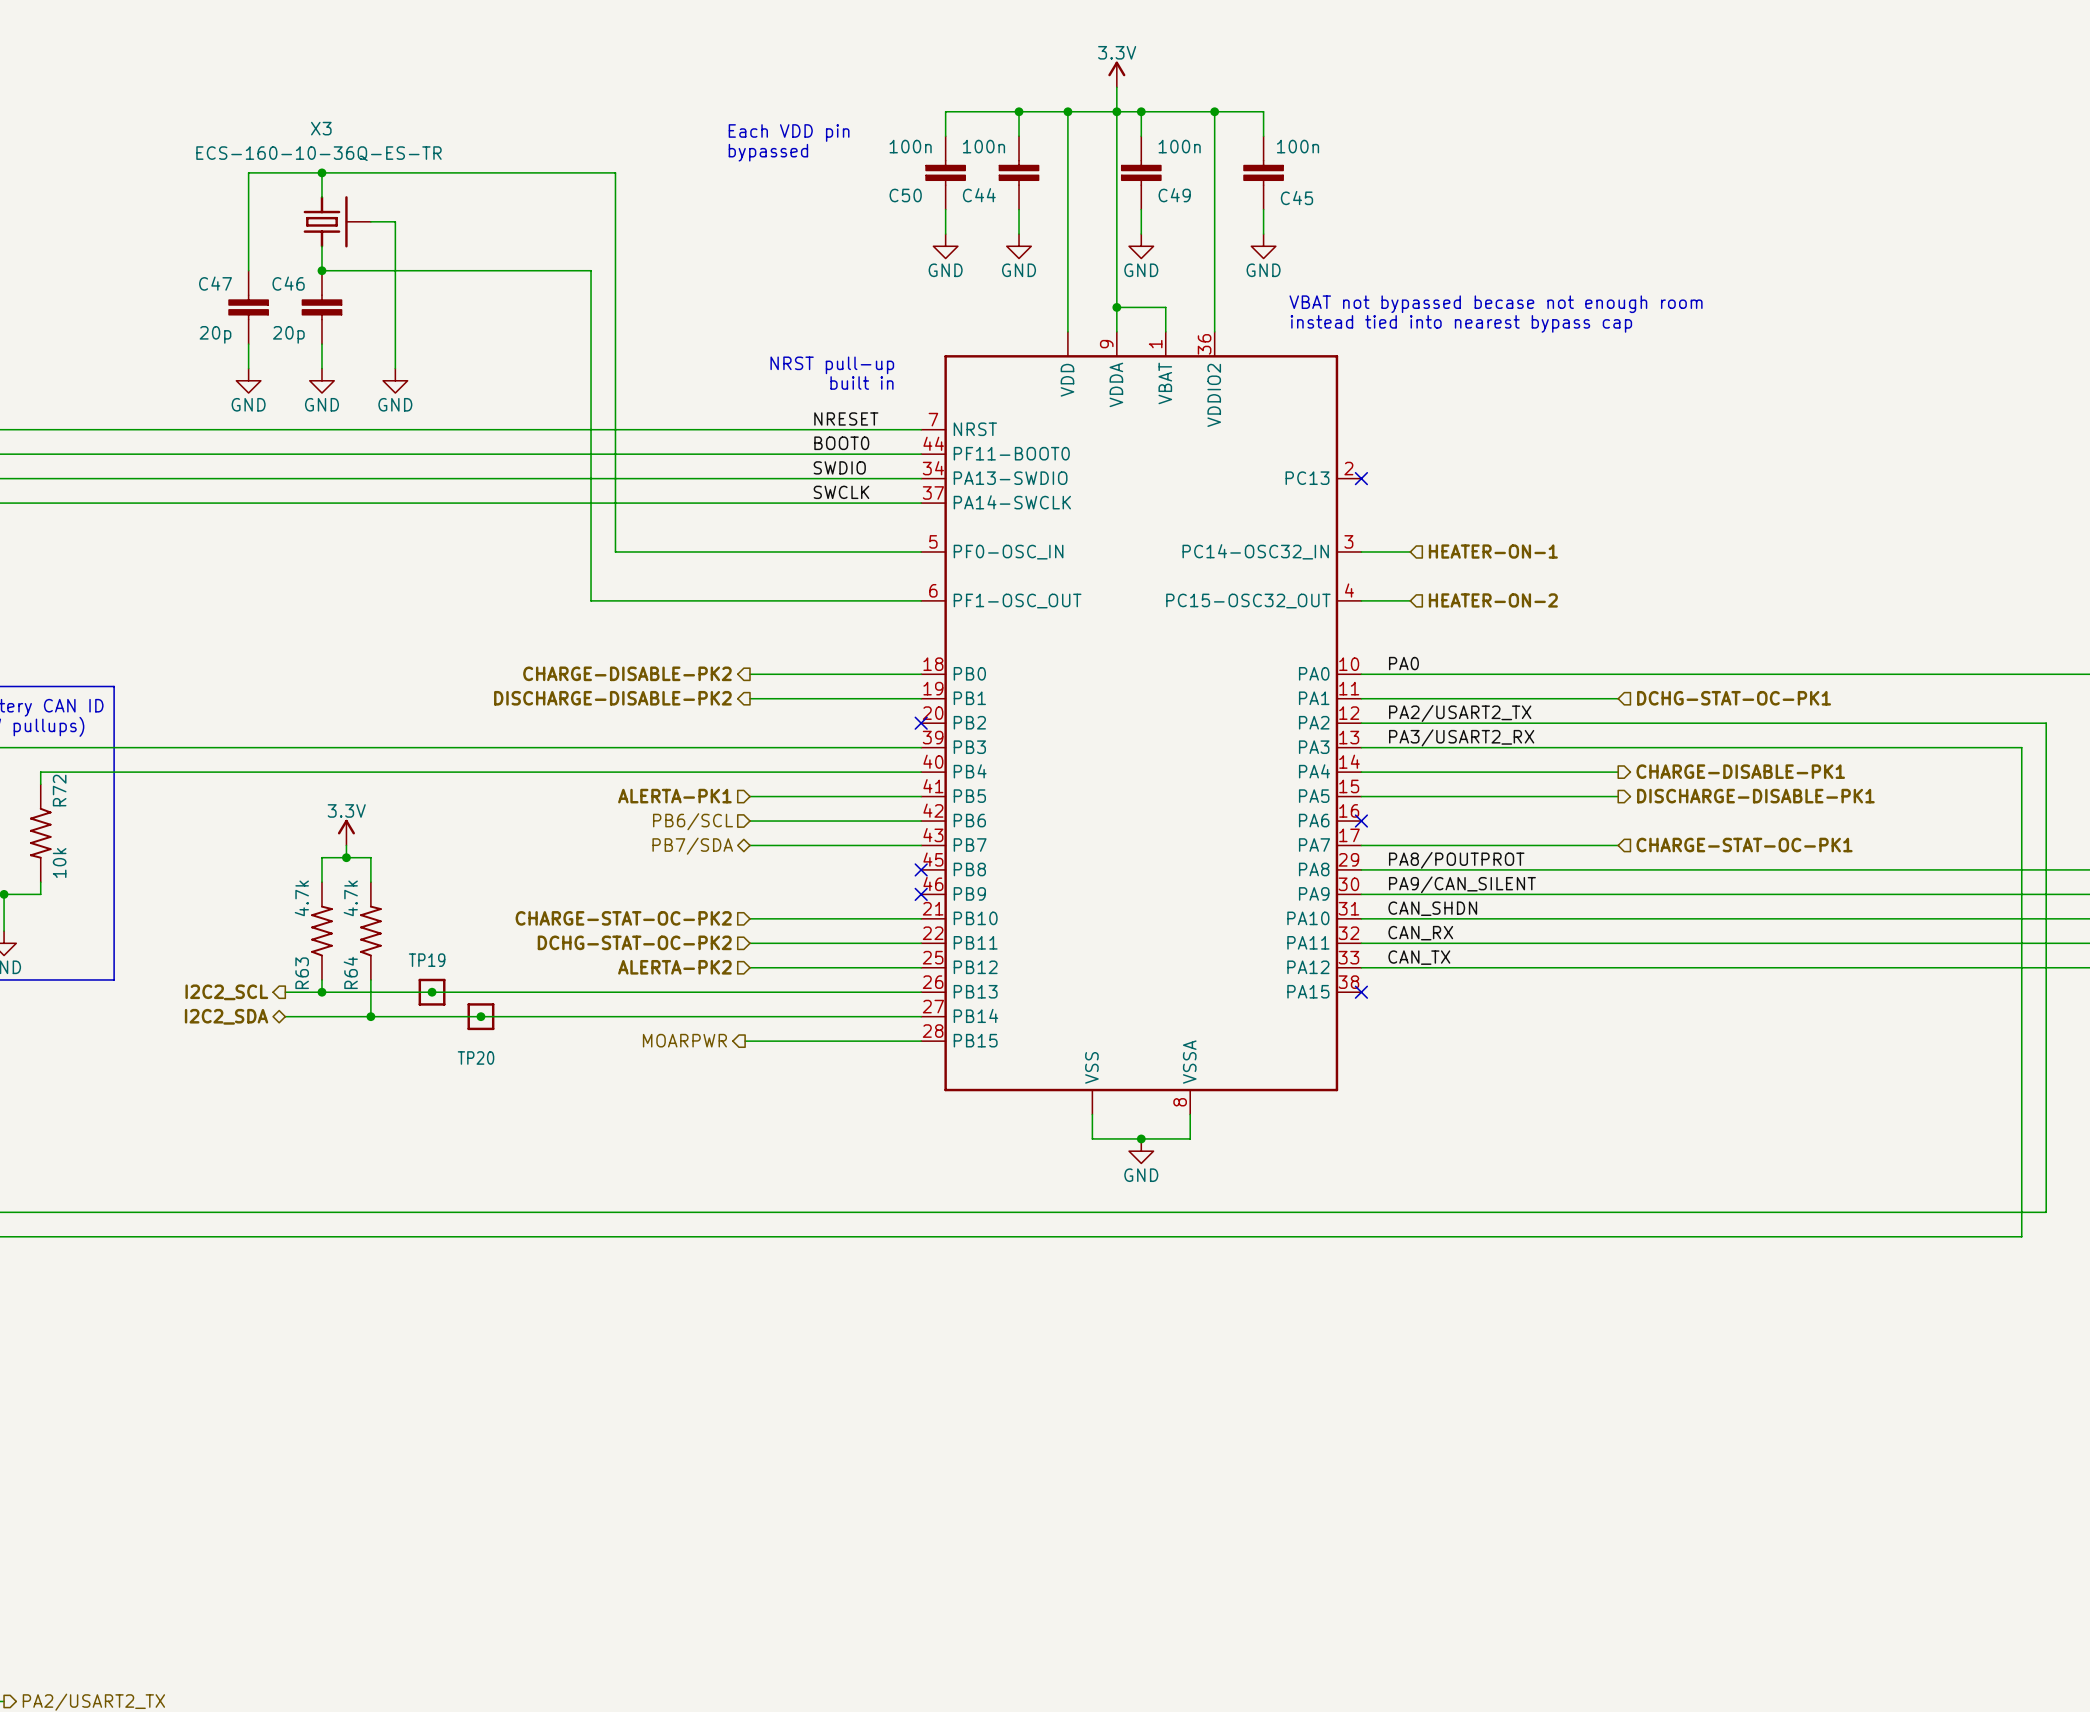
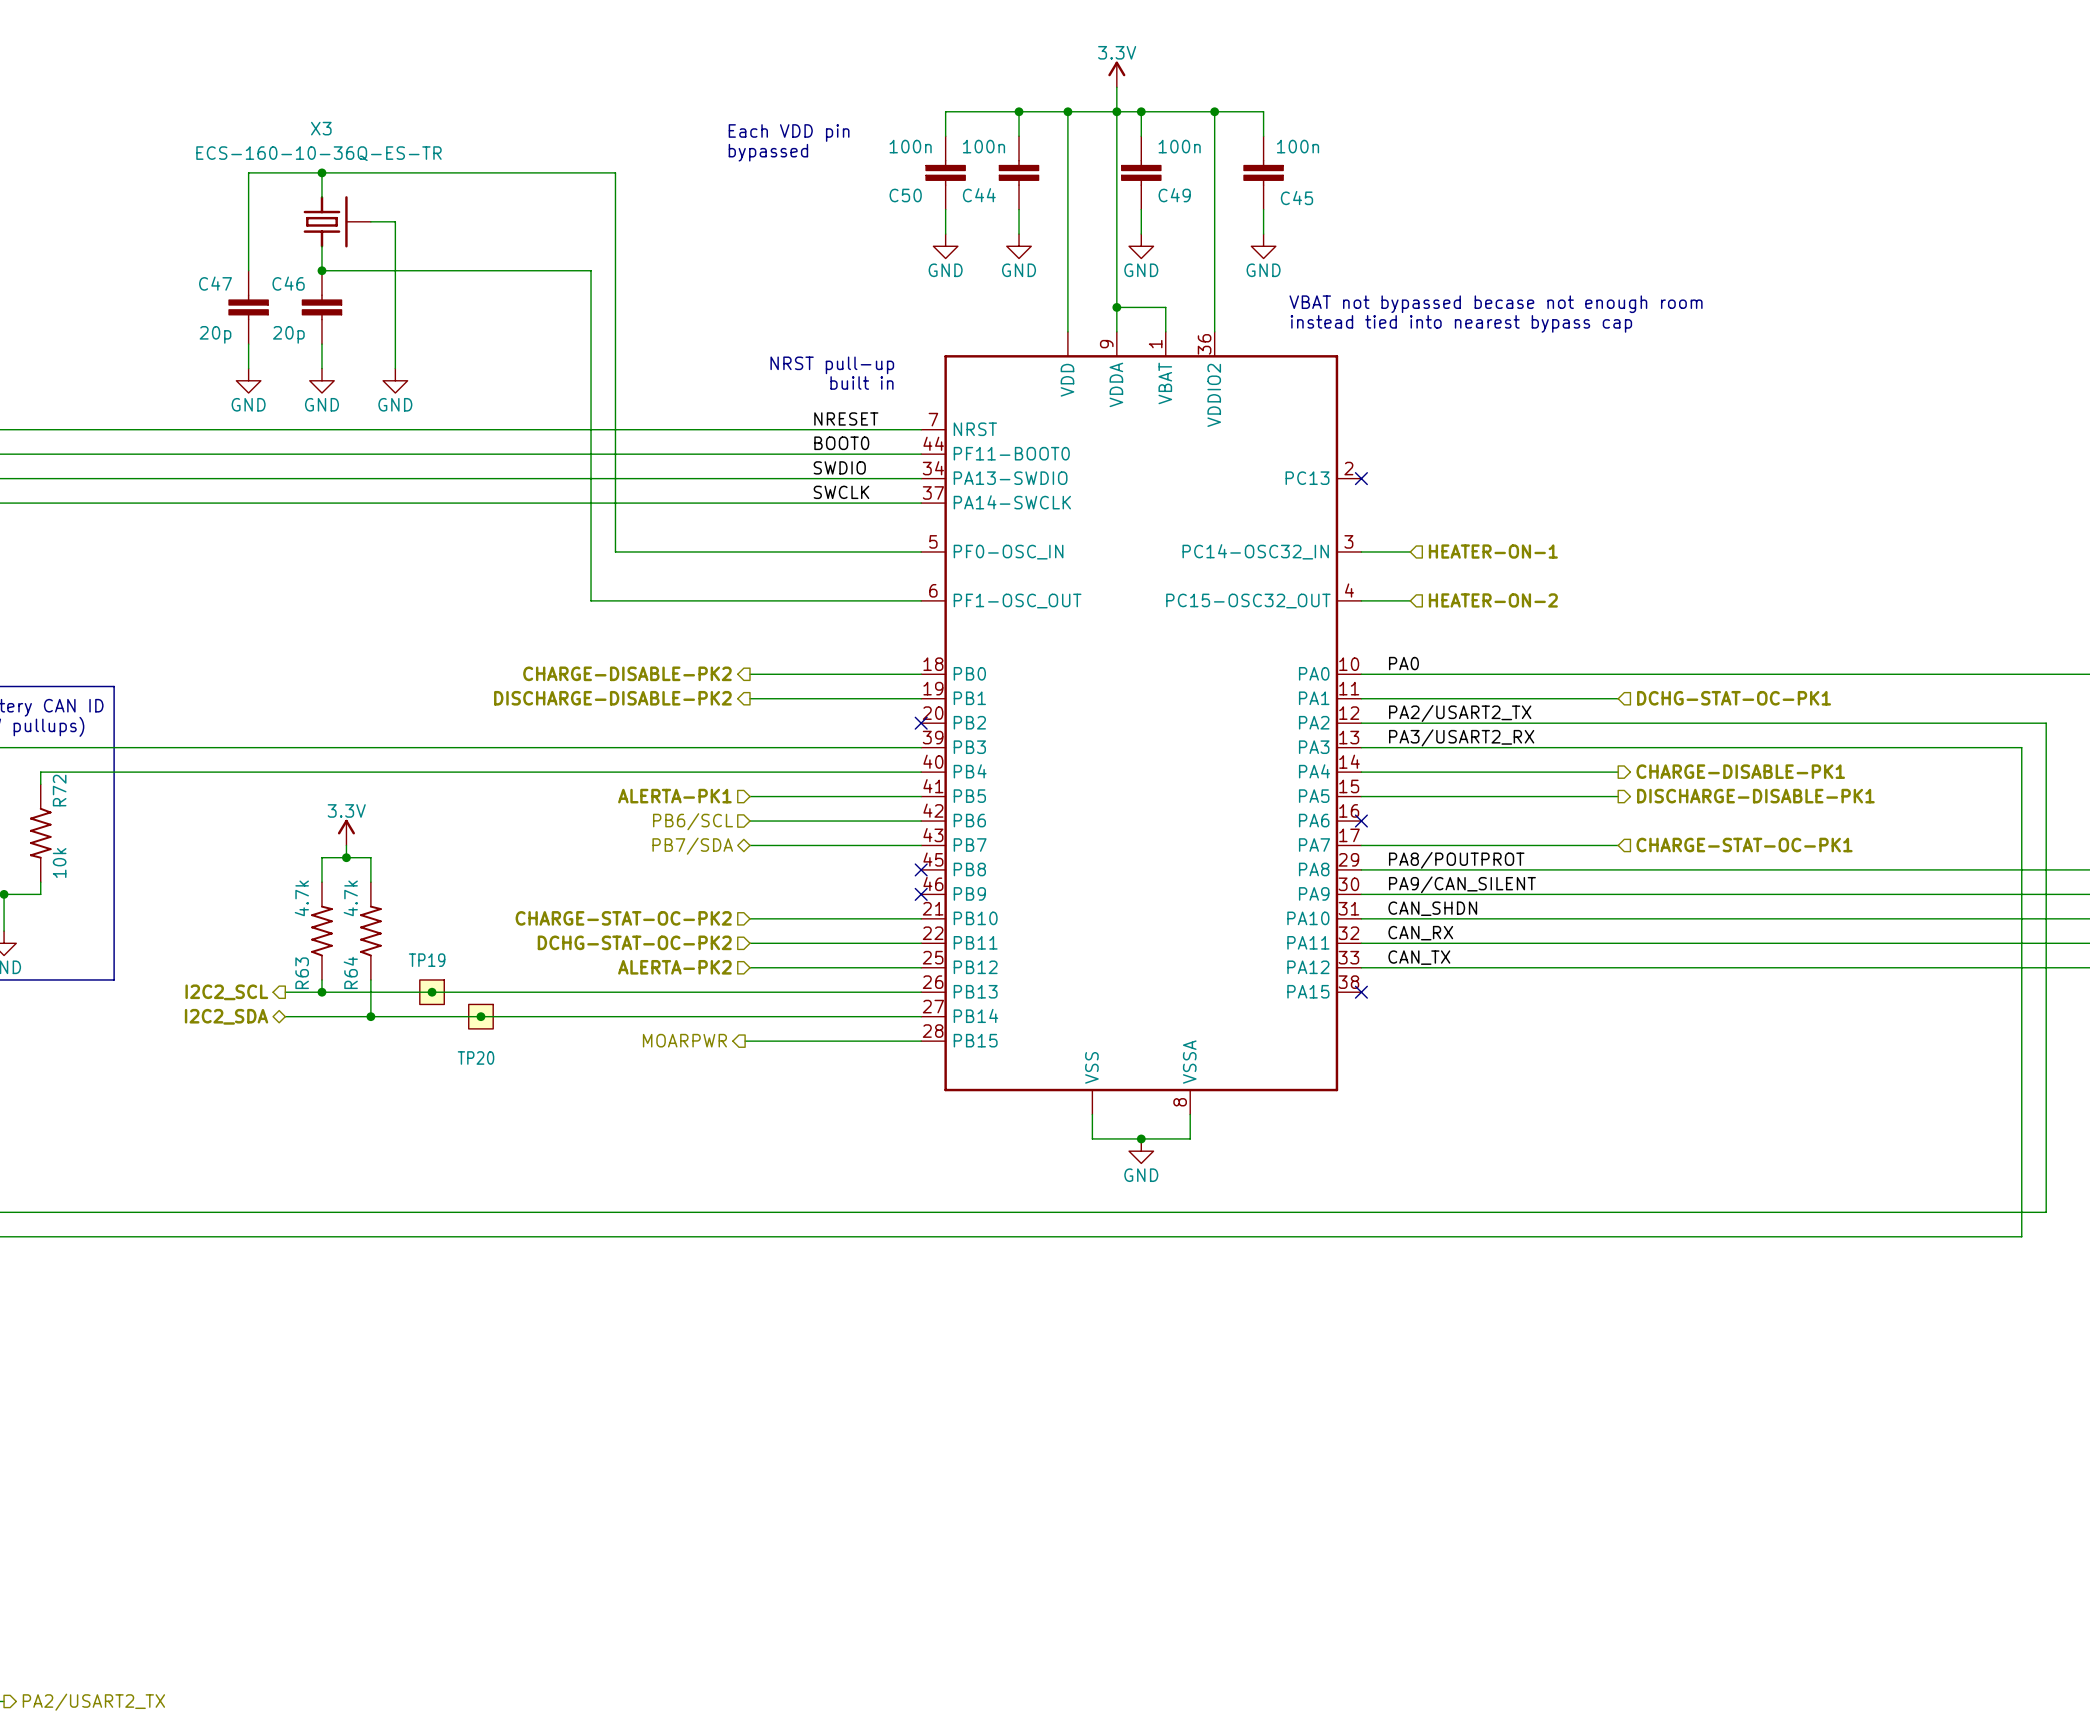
TP19 symbol: [418, 978, 446, 1006] -> [419, 979, 445, 1005]
TP20 symbol: [467, 1003, 495, 1031] -> [468, 1004, 494, 1029]

